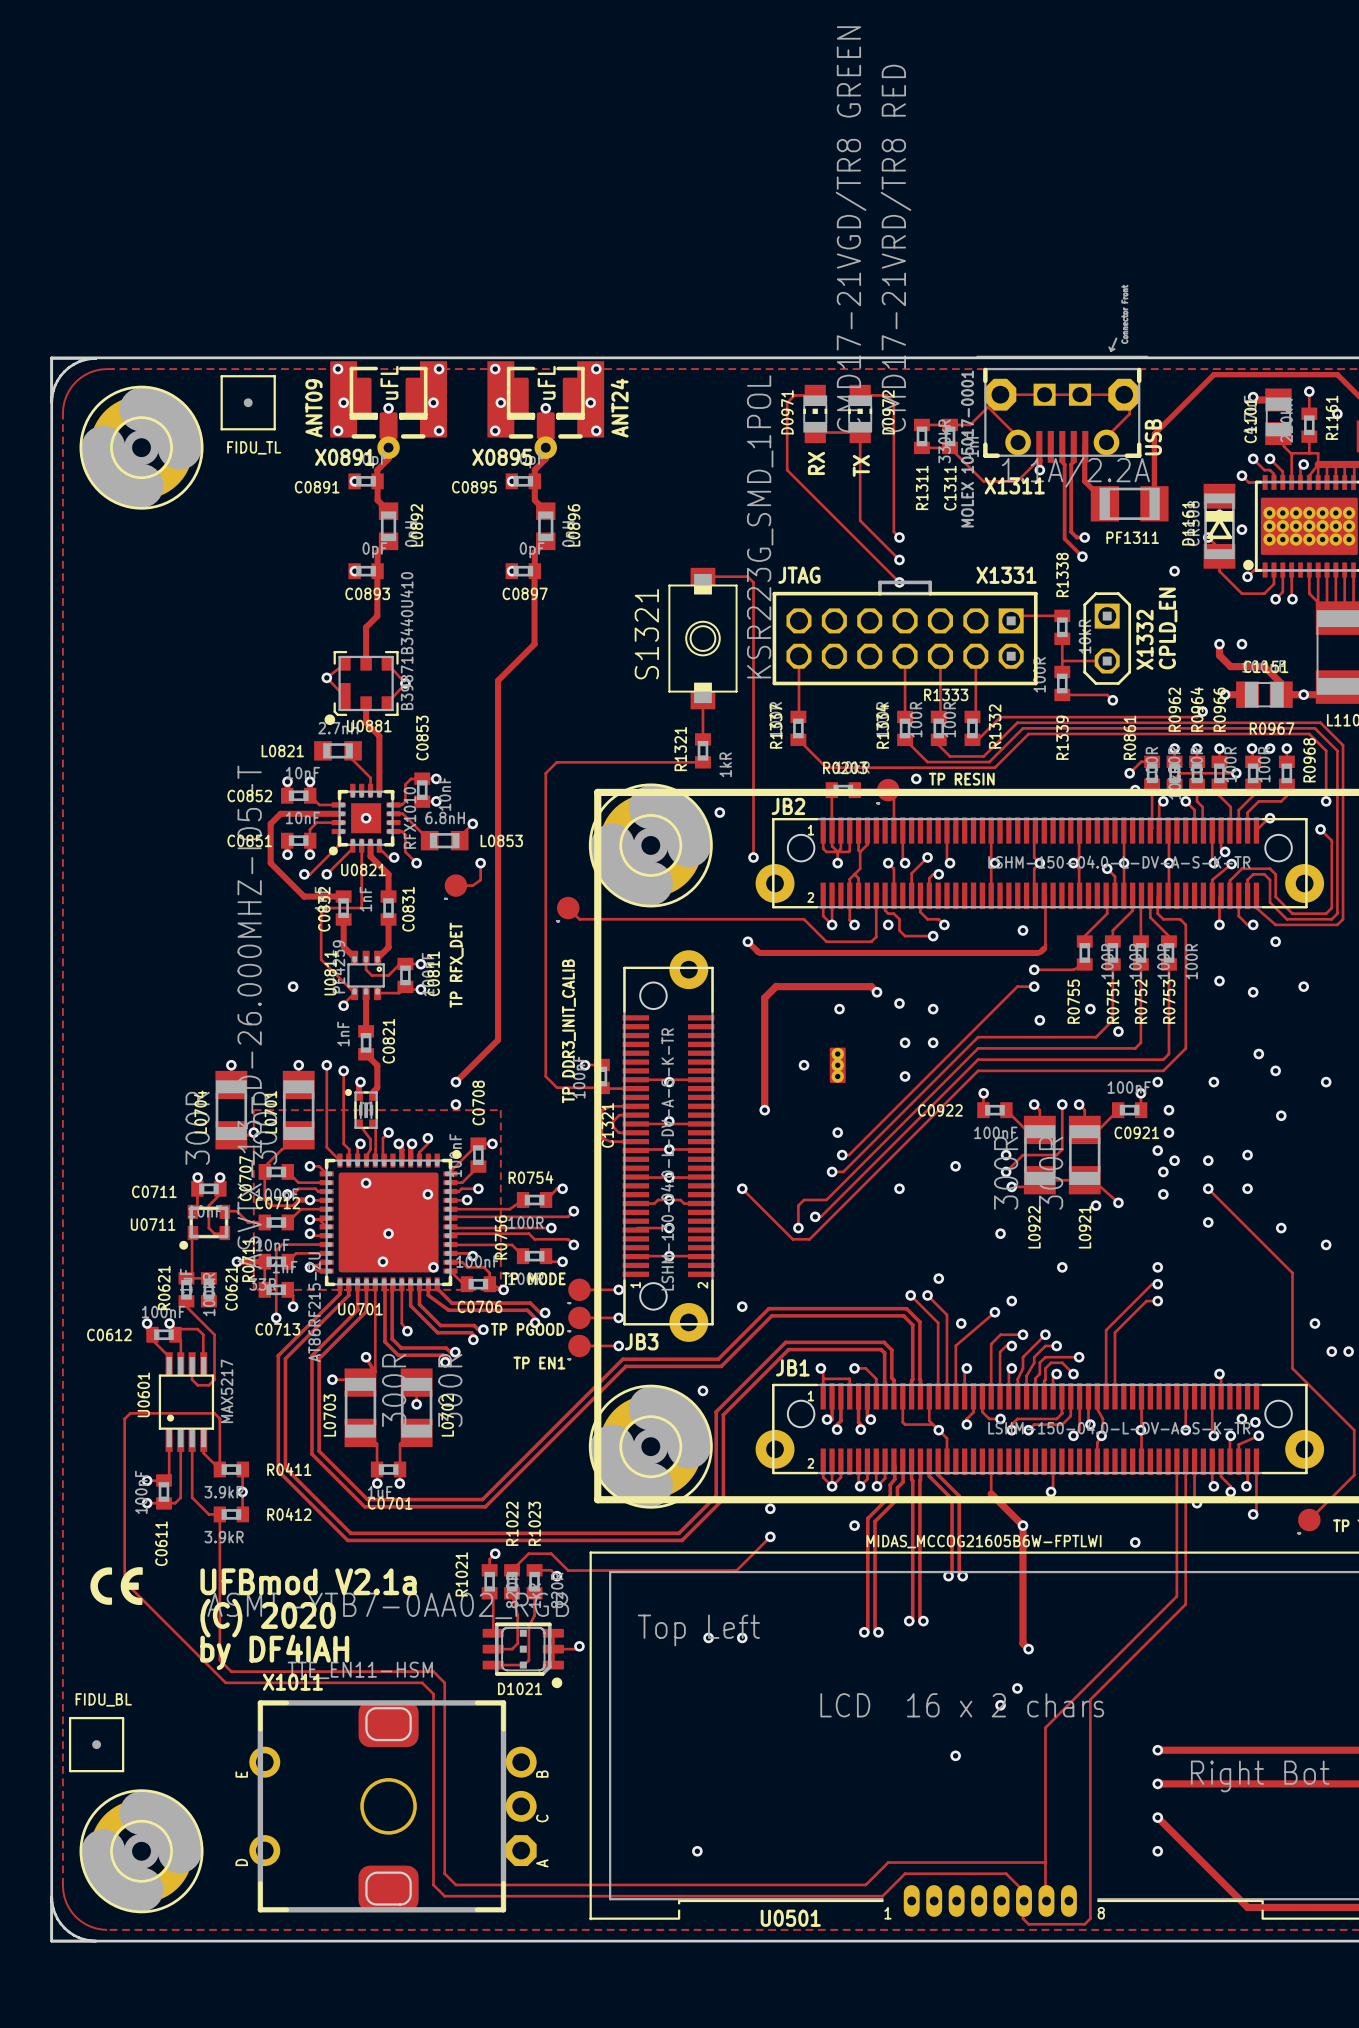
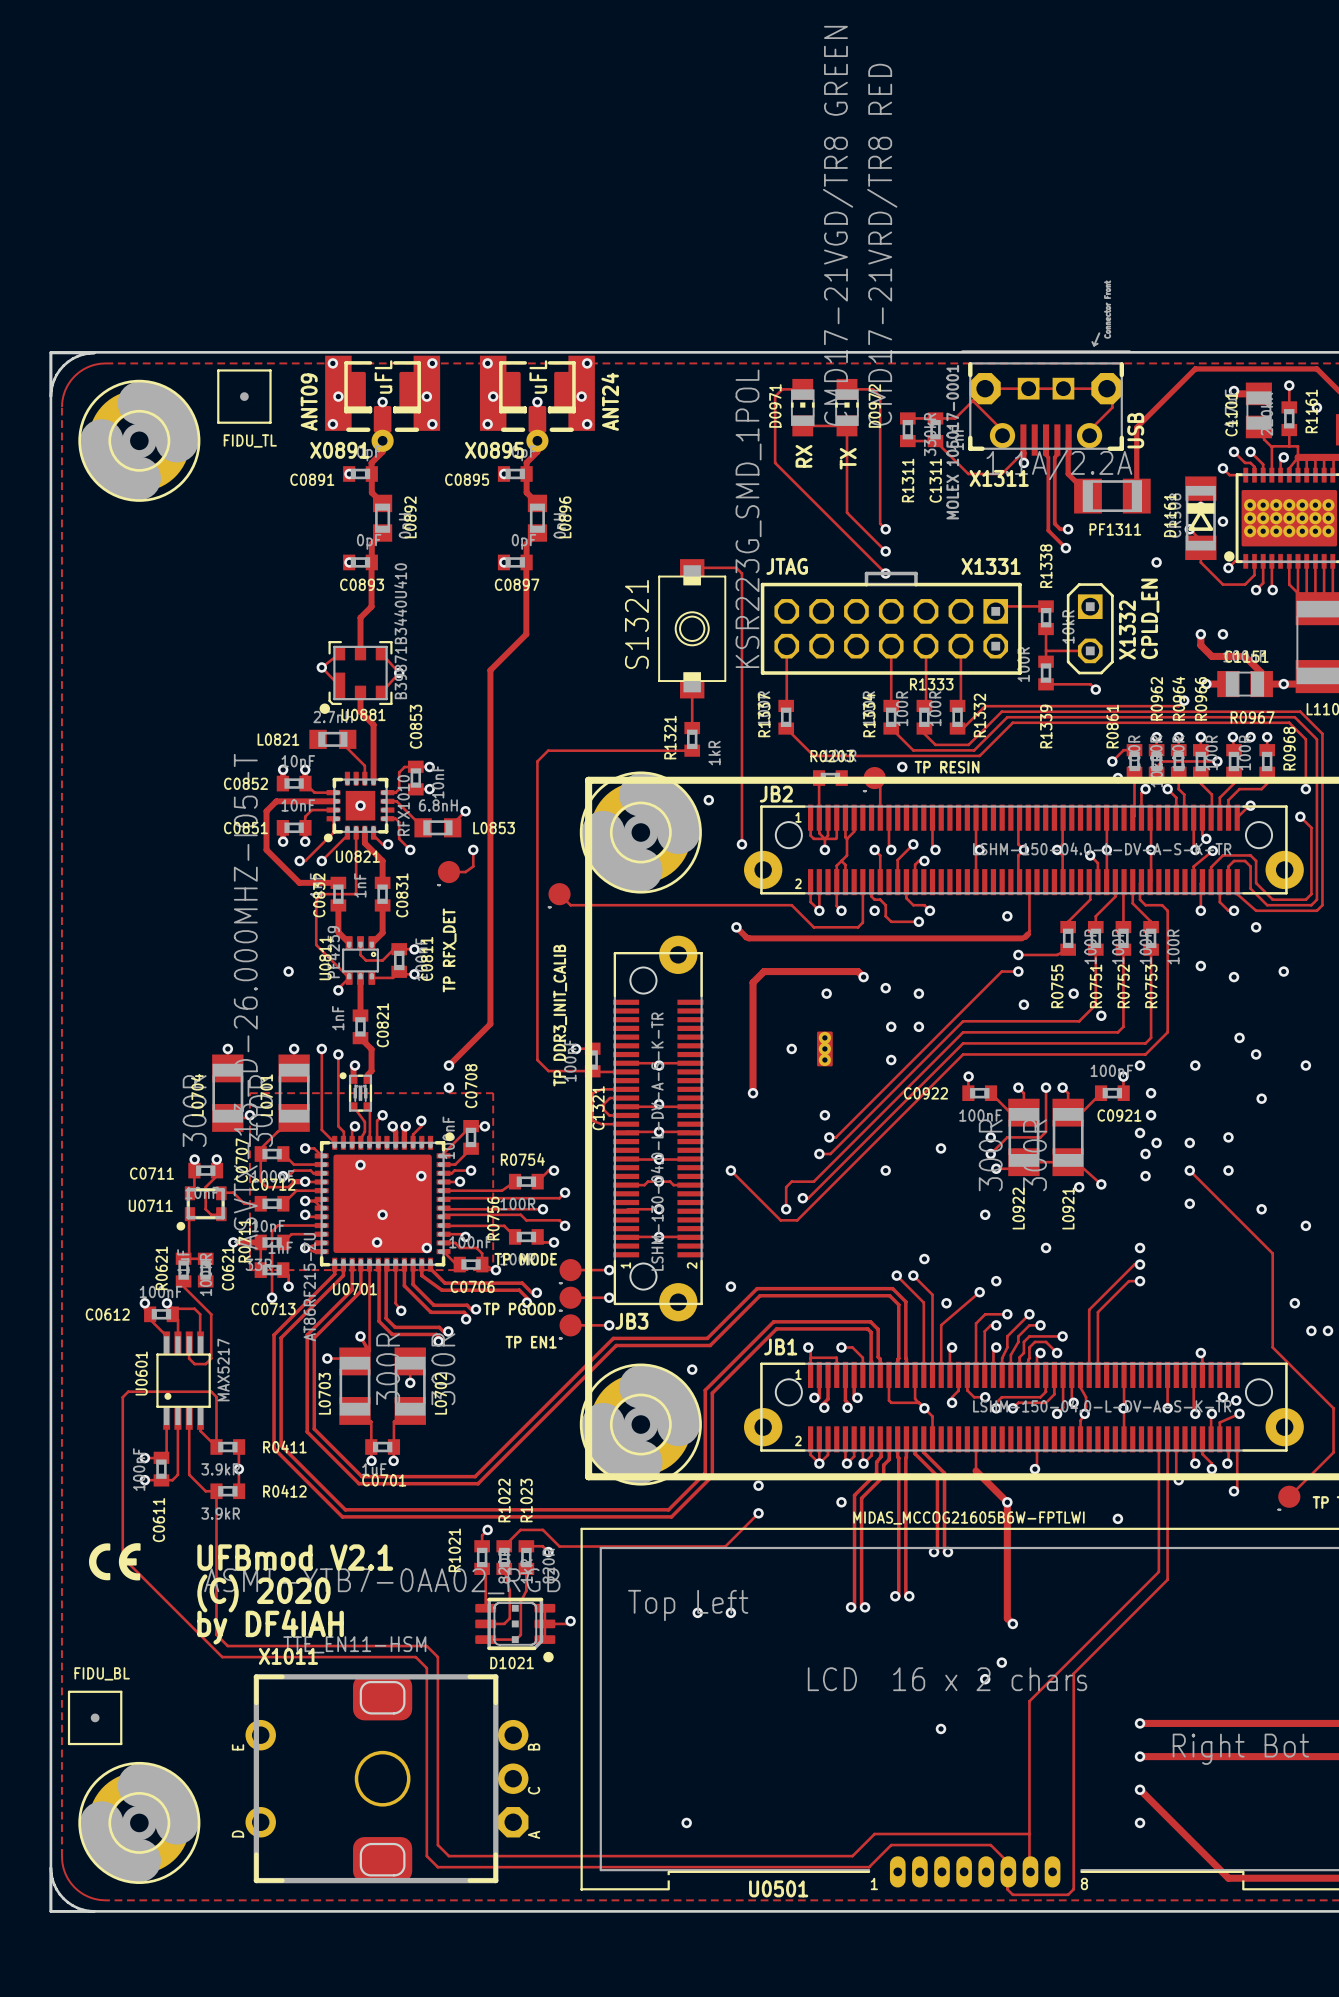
text: UFBmod V2.1a (308, 1581) -> UFBmod V2.1 (295, 1557)

